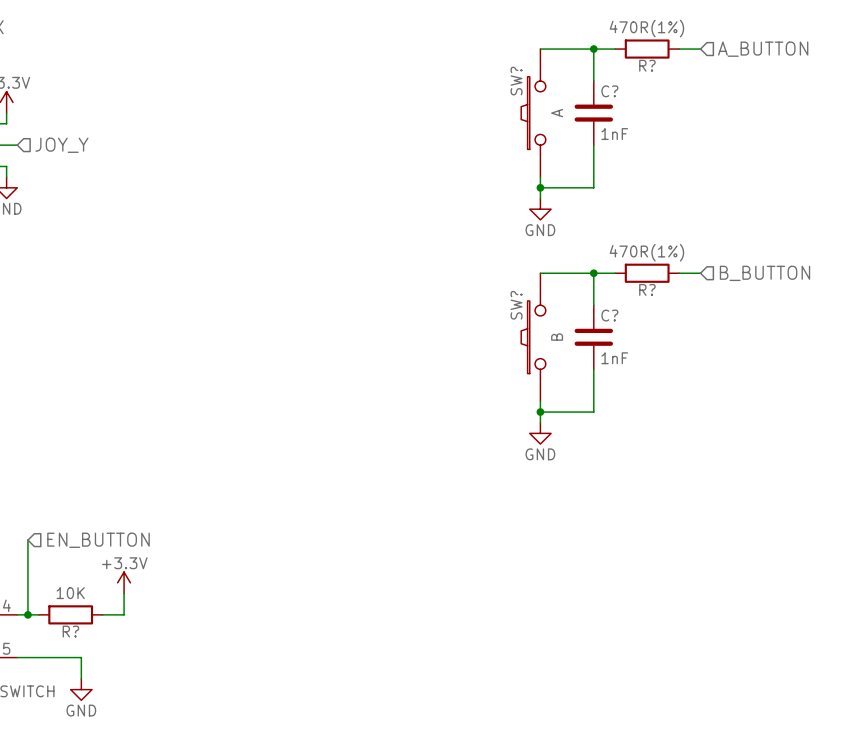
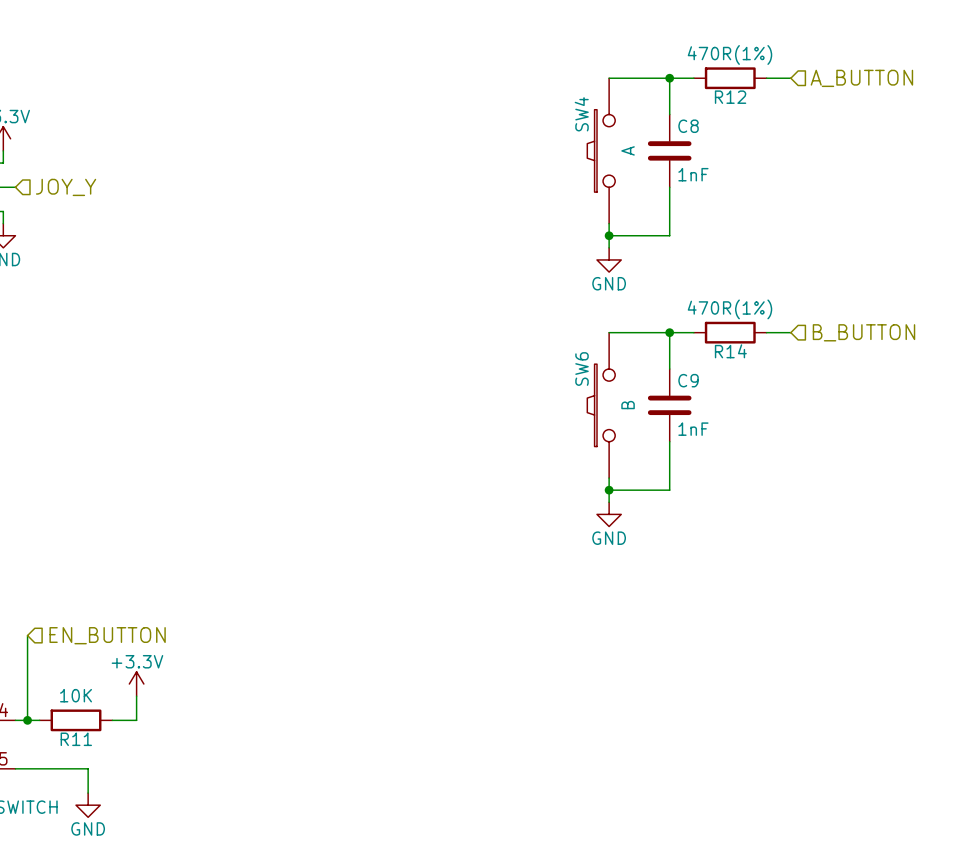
R? name: R? (647, 65) -> R12 (730, 97)
SW? name: SW? (516, 81) -> SW4 (581, 114)
C? name: C? (609, 91) -> C8 (688, 126)
R? name: R? (647, 289) -> R14 (730, 351)
SW? name: SW? (516, 305) -> SW6 (582, 369)
C? name: C? (609, 315) -> C9 (688, 380)
R? name: R? (70, 631) -> R11 (76, 739)

